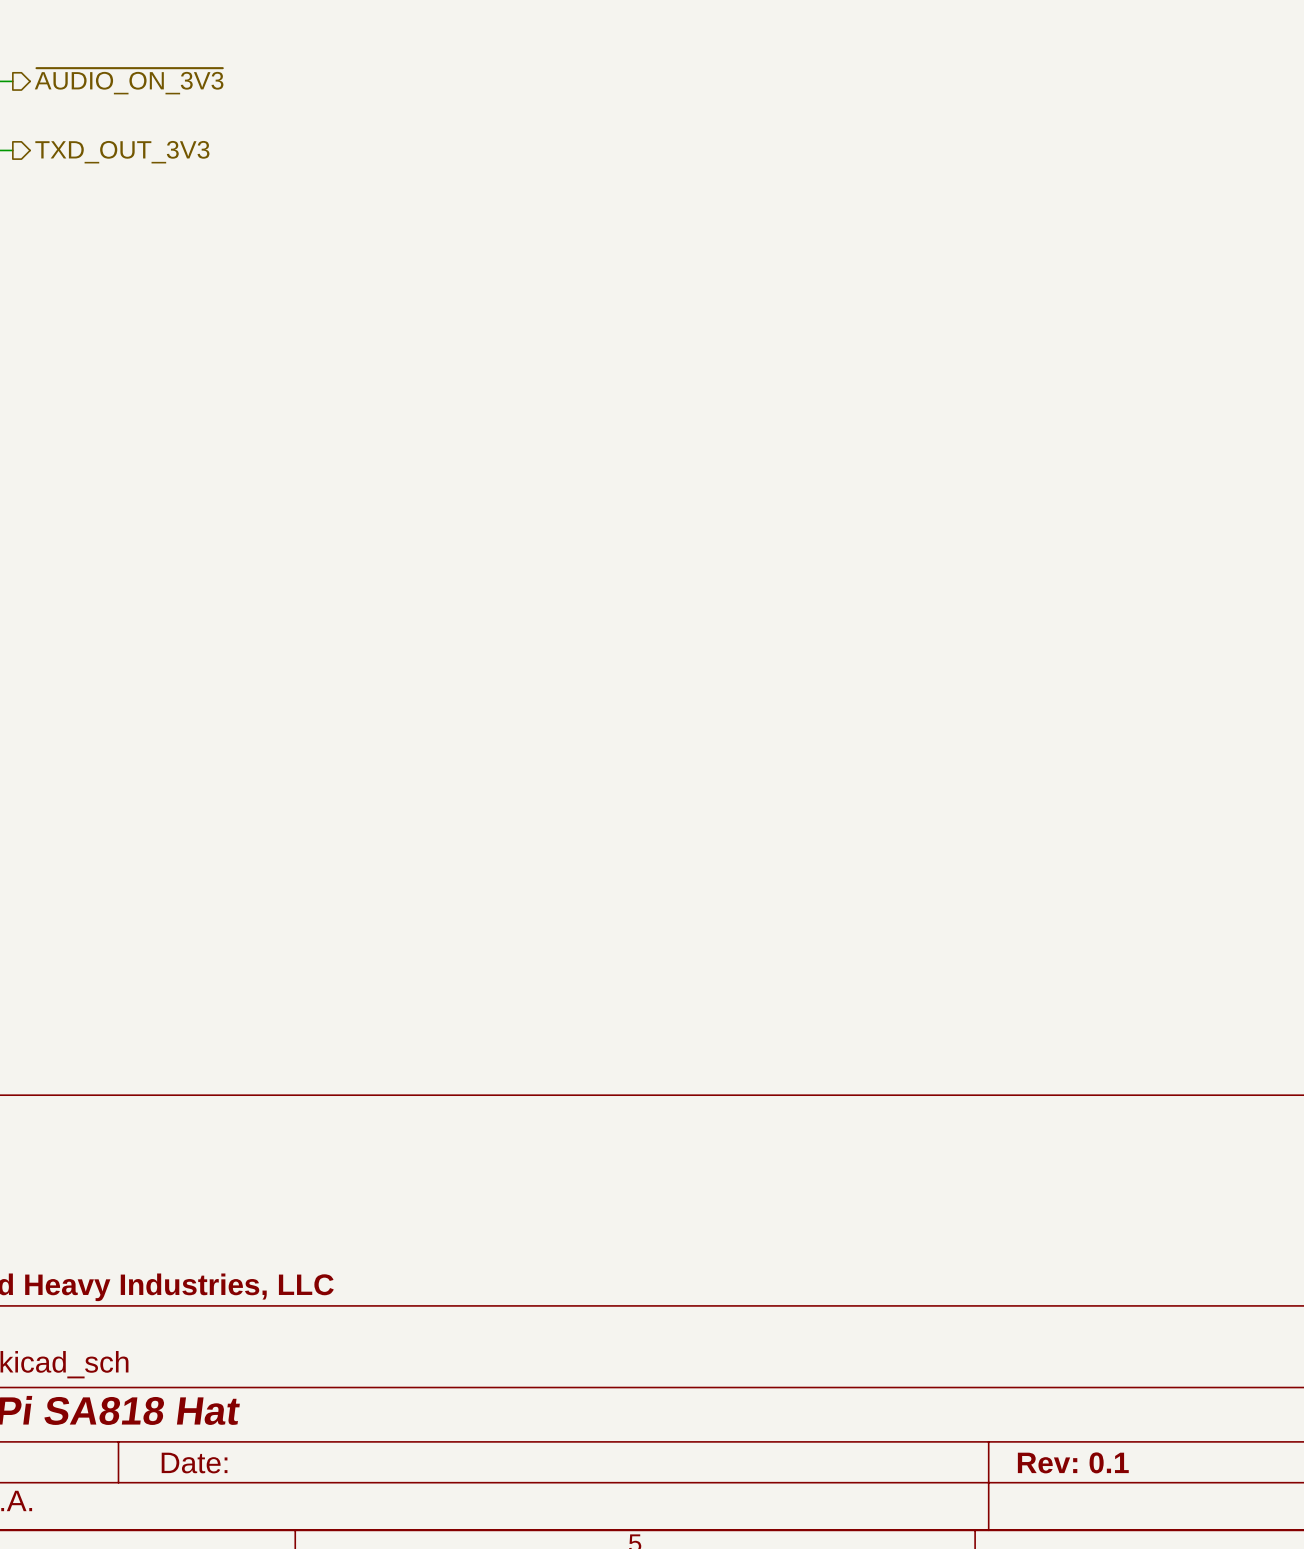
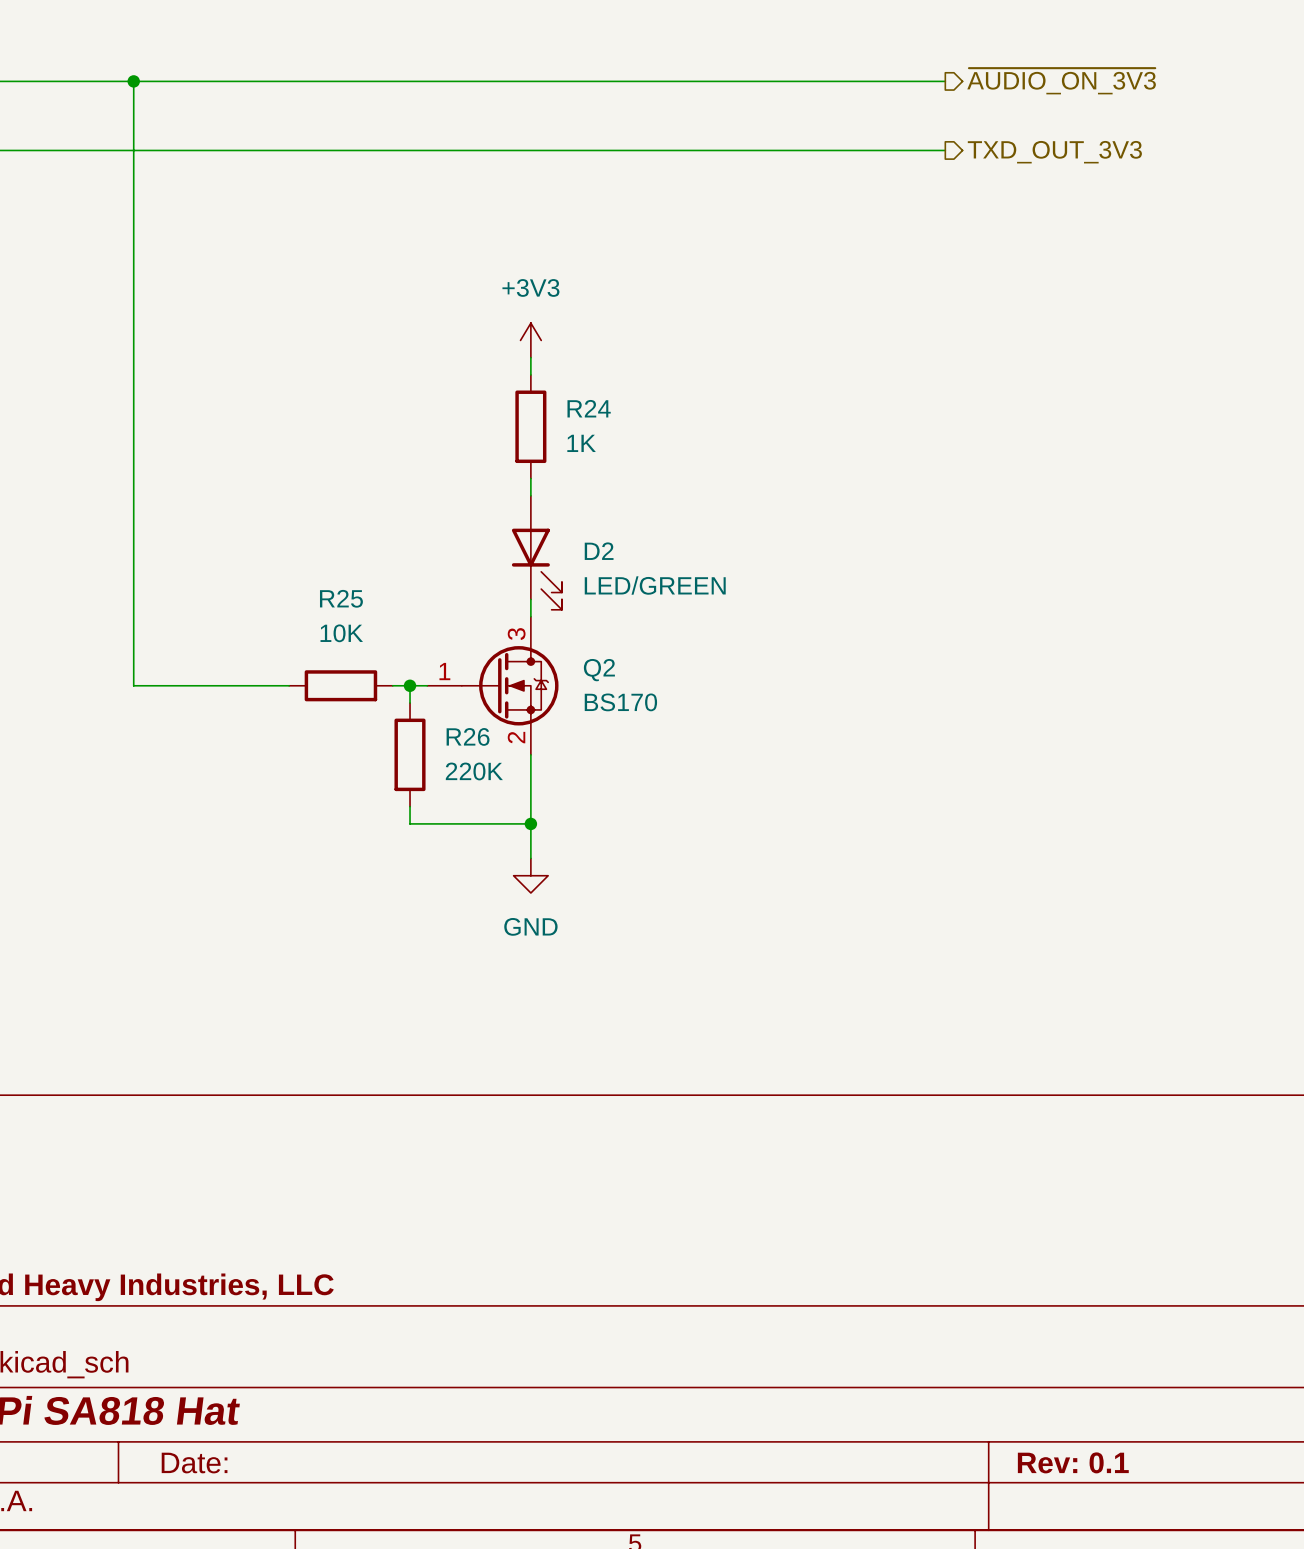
wire: none -> (12, 81) (945, 81)
hierarchical label: ~{AUDIO_ON_3V3} (129, 81) -> none
wire: none -> (133, 81) (133, 685) (289, 685)
junction: none -> (133, 81)
hierarchical label: none -> ~{AUDIO_ON_3V3} (1061, 81)
wire: none -> (12, 150) (945, 150)
hierarchical label: TXD_OUT_3V3 (122, 152) -> none
hierarchical label: none -> TXD_OUT_3V3 (1054, 152)
power symbol: none -> +3V3 (530, 340)
wire: none -> (530, 357) (530, 374)
R24: none -> 1K (530, 426)
wire: none -> (530, 478) (530, 495)
D2: none -> LED/GREEN (536, 552)
wire: none -> (530, 599) (530, 616)
R25: none -> 10K (340, 685)
wire: none -> (392, 685) (427, 685)
wire: none -> (410, 685) (410, 703)
junction: none -> (410, 685)
Q2: none -> BS170 (492, 685)
R26: none -> 220K (410, 754)
wire: none -> (530, 754) (530, 858)
wire: none -> (410, 806) (410, 823) (530, 823)
junction: none -> (530, 823)
power symbol: none -> GND (530, 875)

